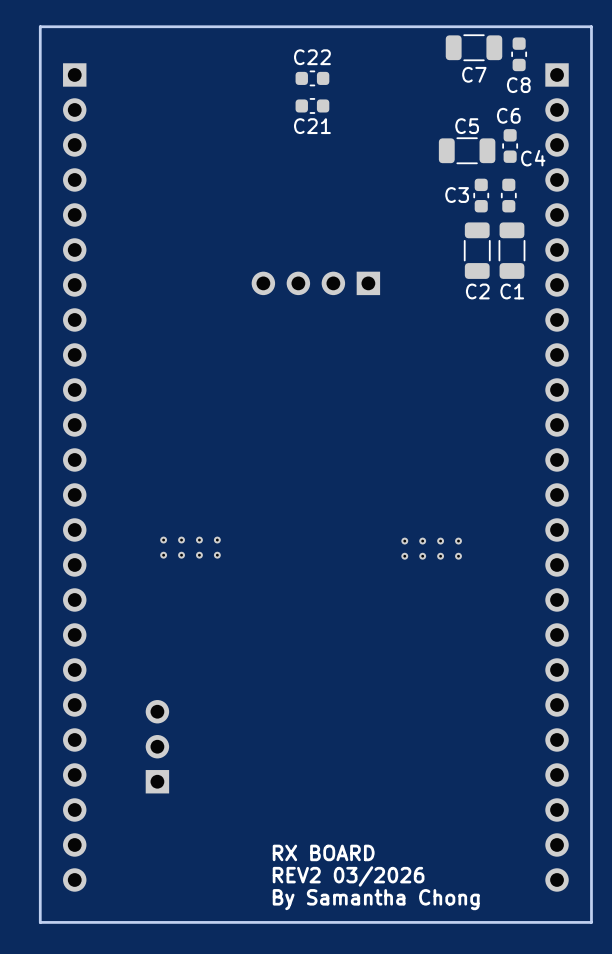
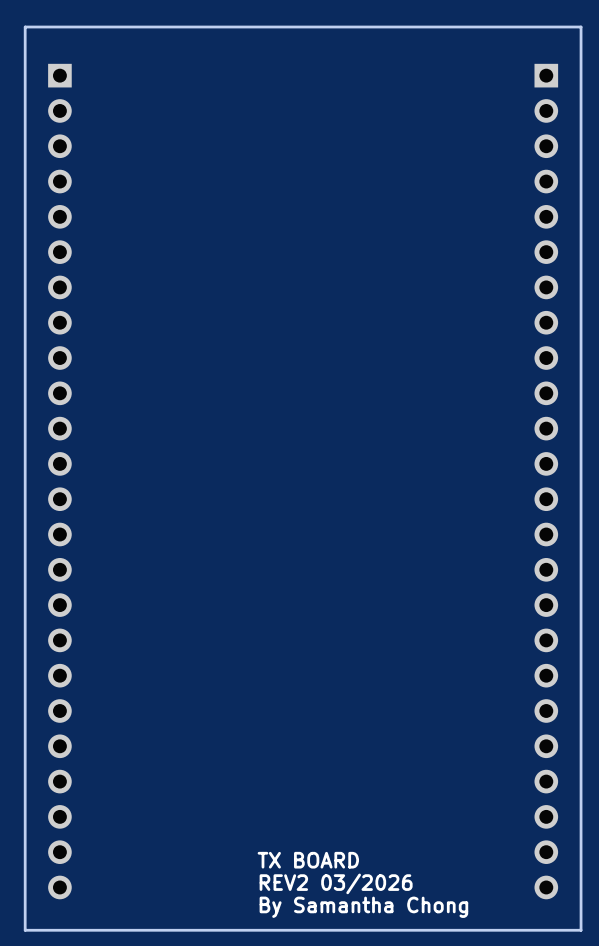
C7: (474, 47) -> none
C8: (519, 54) -> none
C22: (312, 78) -> none
C21: (312, 105) -> none
C6: (510, 146) -> none
C5: (467, 150) -> none
C3: (481, 195) -> none
C4: (508, 195) -> none
C2: (477, 250) -> none
C1: (511, 250) -> none
part: (315, 283) -> none
part: (190, 547) -> none
part: (431, 548) -> none
part: (157, 746) -> none
text: RX BOARD (323, 852) -> TX BOARD (308, 860)

